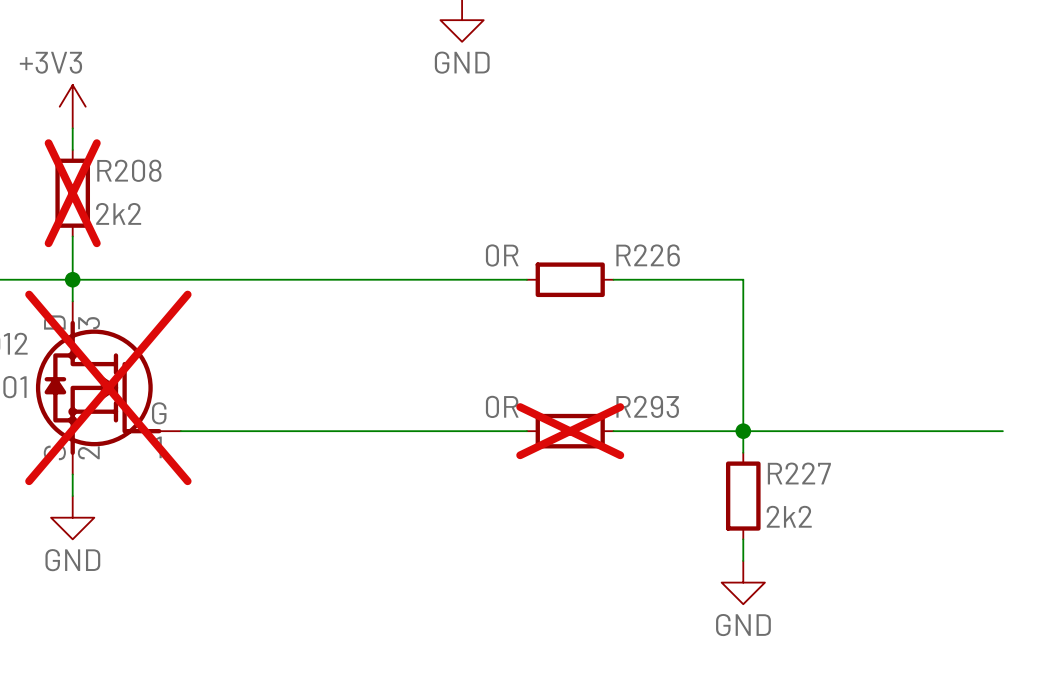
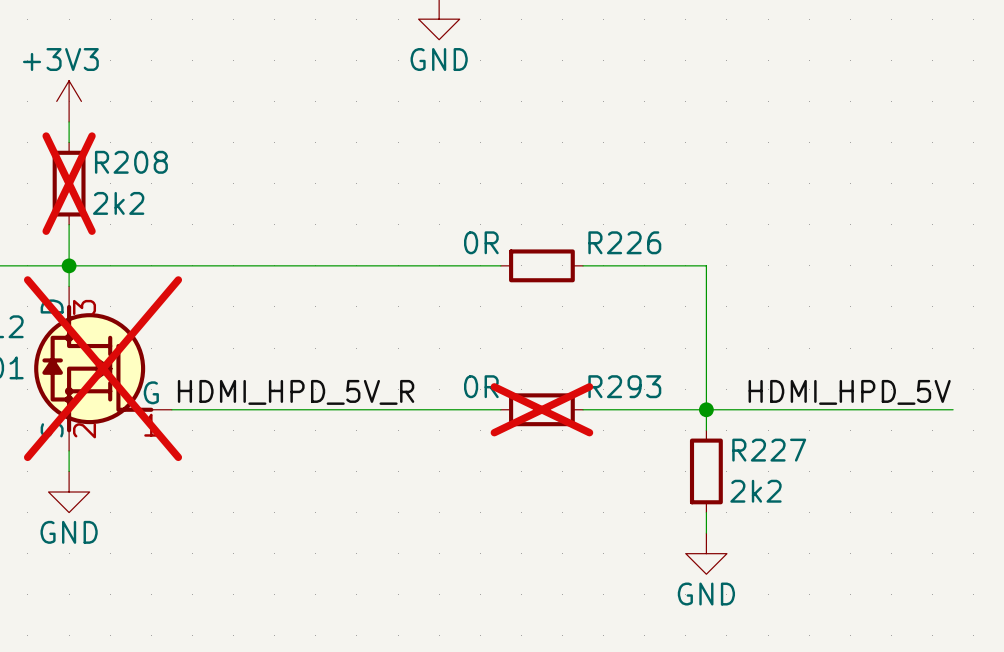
label: none -> HDMI_HPD_5V_R (296, 392)
label: none -> HDMI_HPD_5V (849, 392)

